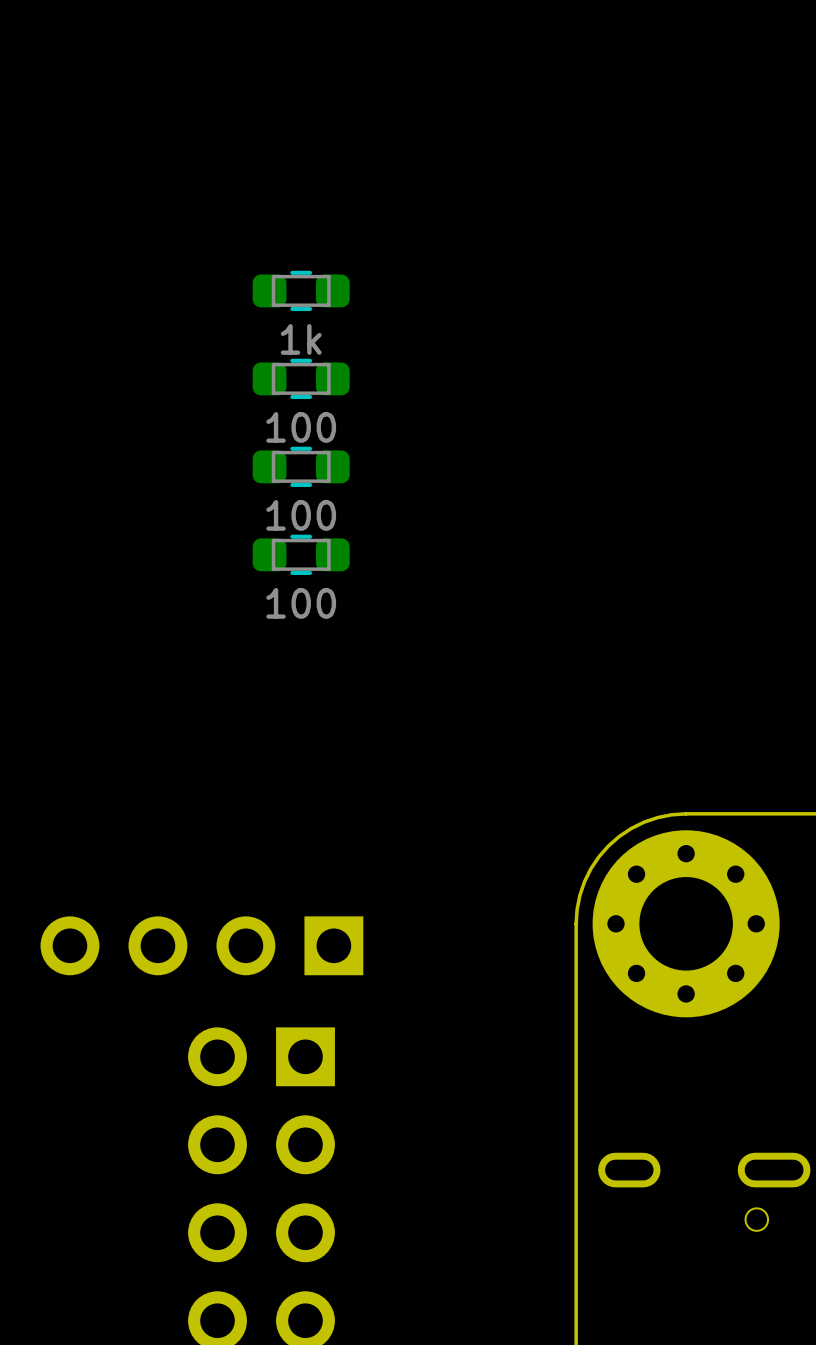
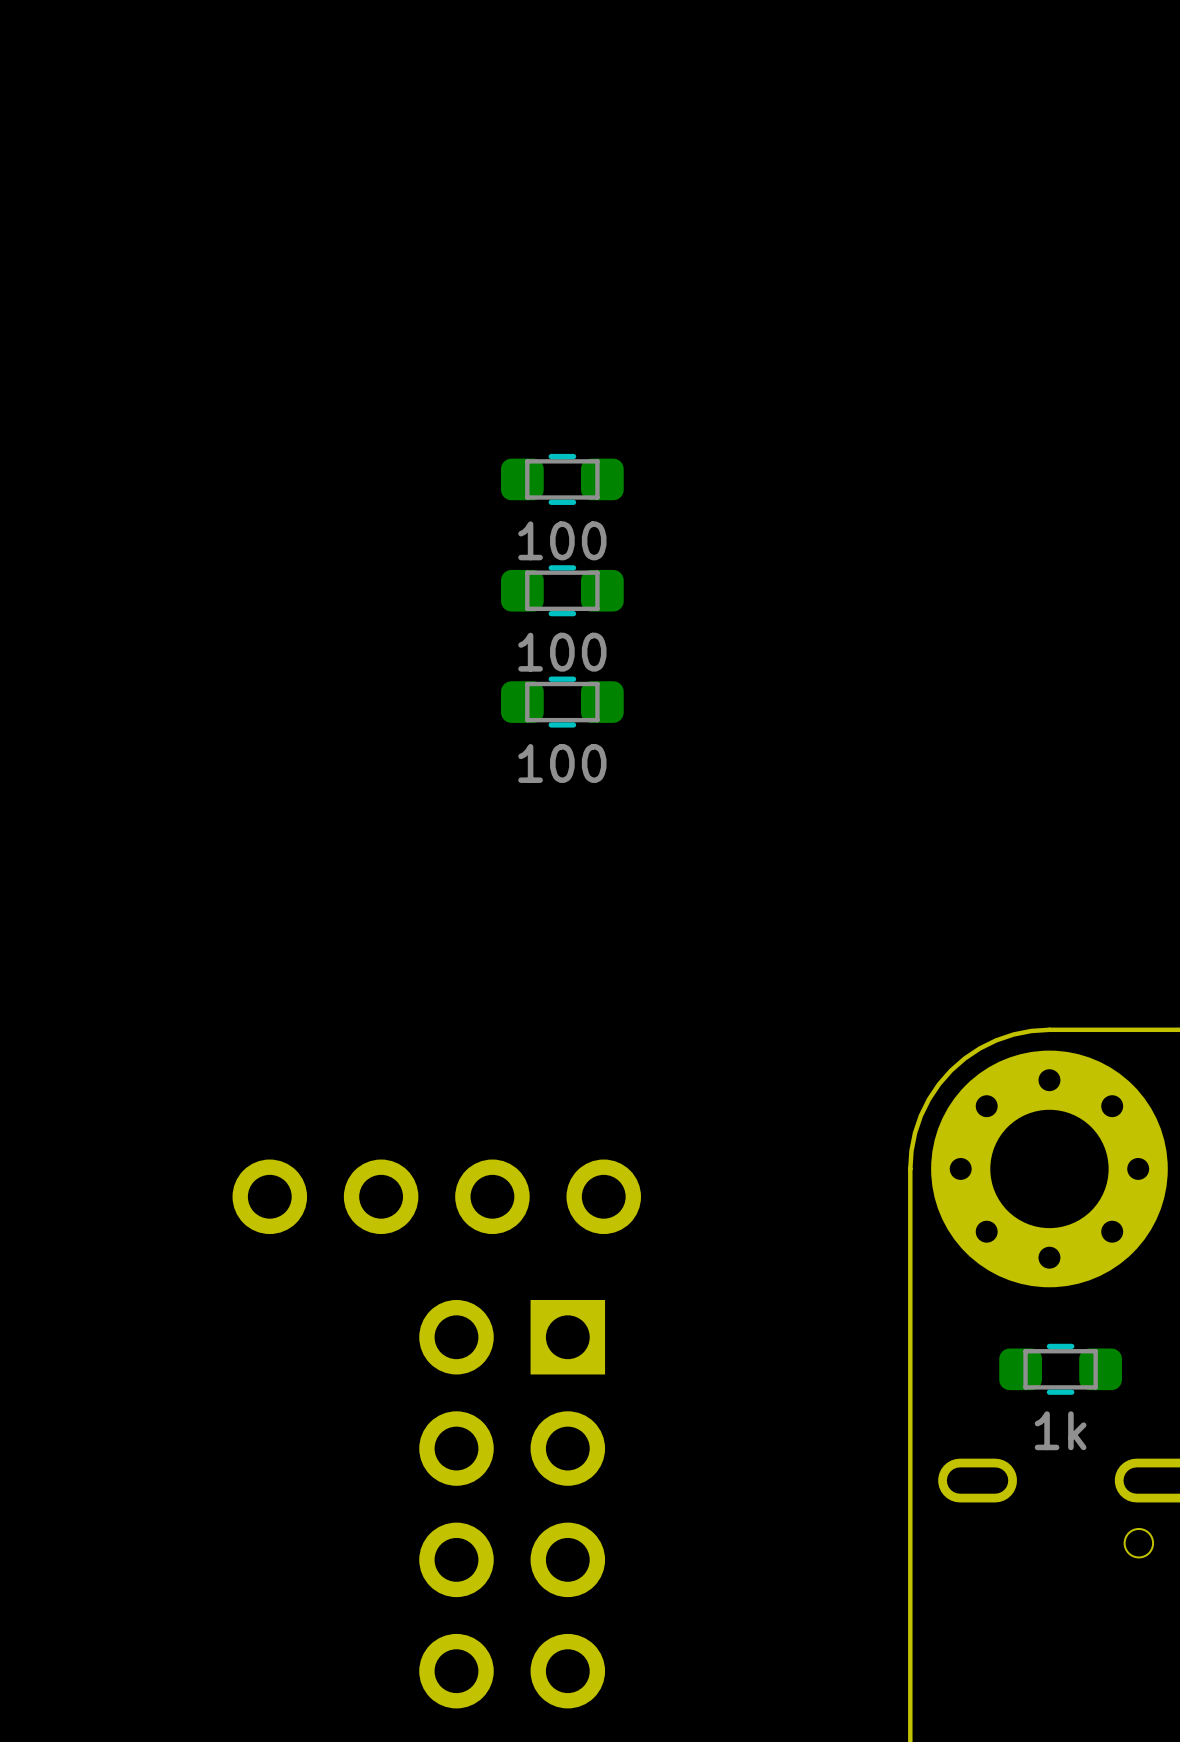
part: 1k (301, 290) -> none
part footprint: [40, 916, 364, 976] -> [232, 1159, 642, 1235]
part: none -> 1k (1060, 1369)

